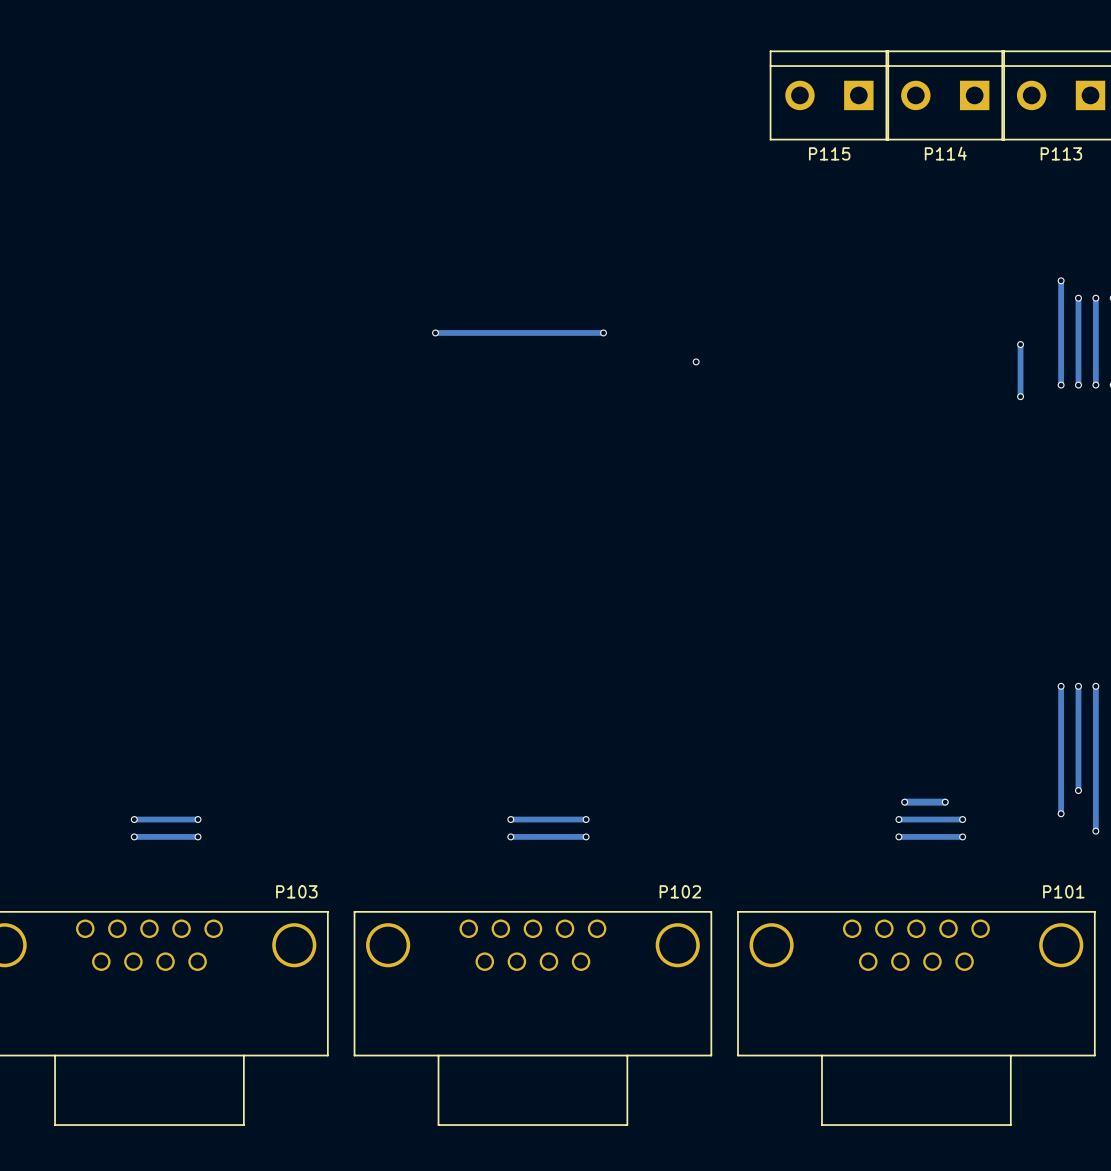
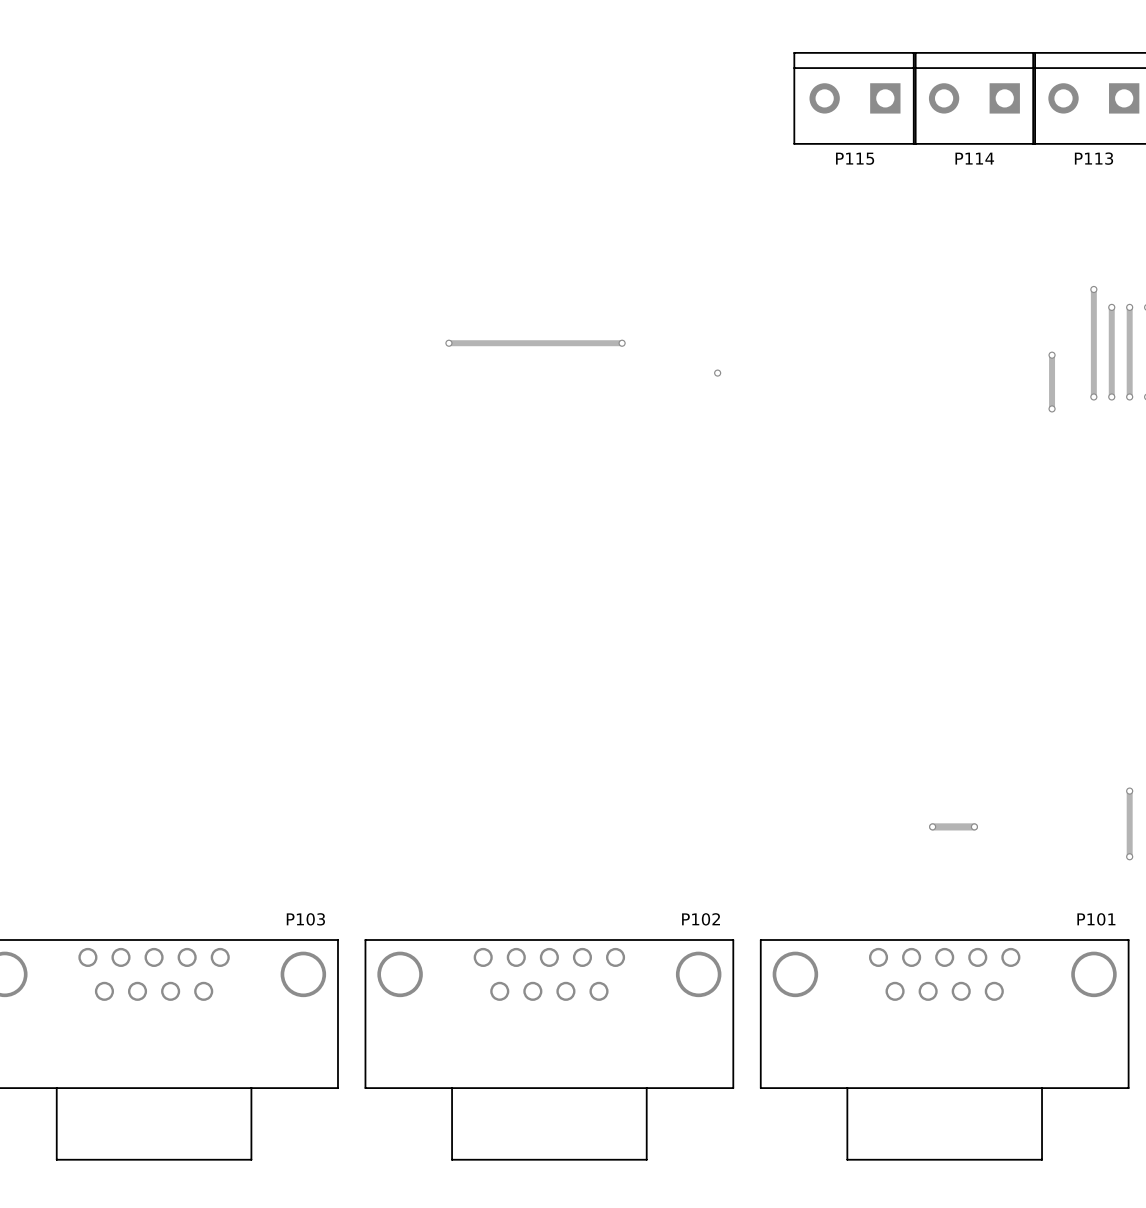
track: (1061, 686) (1061, 813) -> none
via: (1061, 686) -> none
track: (1078, 686) (1078, 790) -> none
via: (1078, 686) -> none
track: (1095, 686) (1095, 767) -> none
via: (1095, 686) -> none
via: none -> (1129, 791)
via: (1078, 790) -> none
via: (1061, 813) -> none
via: (134, 819) -> none
track: (198, 819) (134, 819) -> none
via: (198, 819) -> none
via: (510, 819) -> none
track: (586, 819) (510, 819) -> none
via: (586, 819) -> none
via: (898, 819) -> none
track: (962, 819) (898, 819) -> none
via: (962, 819) -> none
via: (134, 836) -> none
track: (198, 836) (134, 836) -> none
via: (198, 836) -> none
via: (510, 836) -> none
track: (586, 836) (510, 836) -> none
via: (586, 836) -> none
via: (898, 836) -> none
track: (962, 836) (898, 836) -> none
via: (962, 836) -> none

